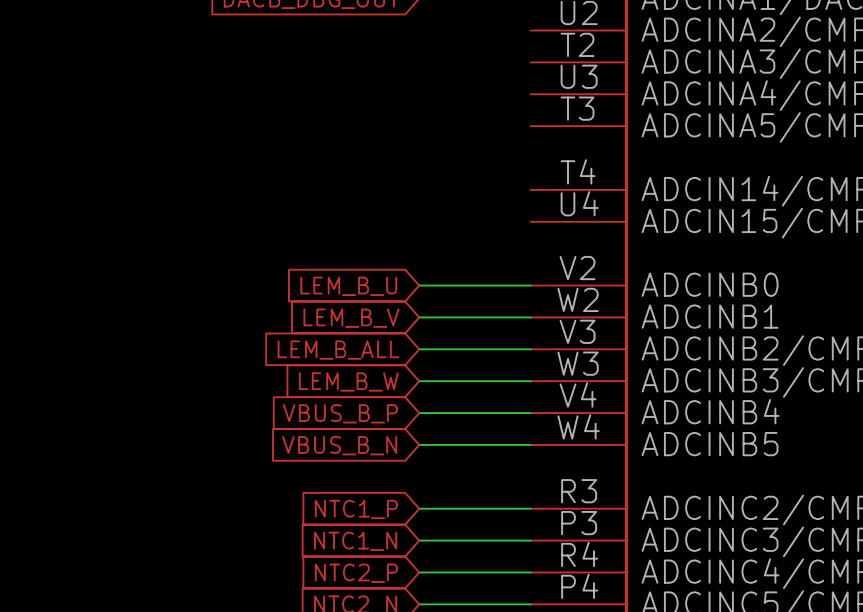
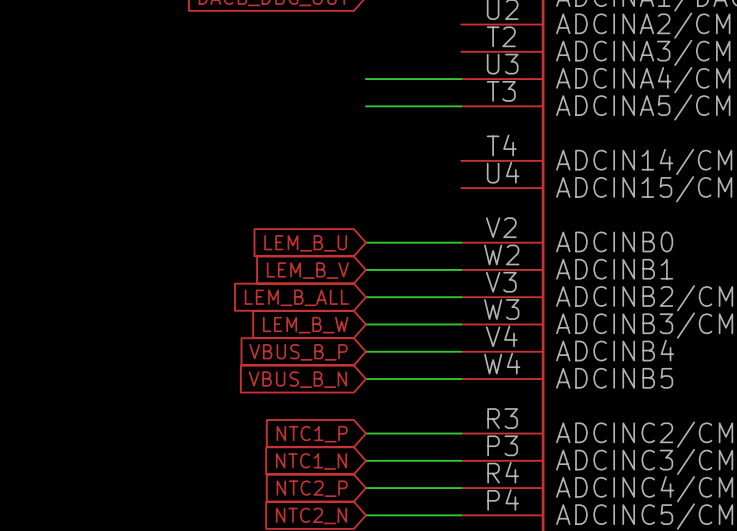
wire: none -> (365, 79) (461, 79)
wire: none -> (365, 106) (461, 106)

